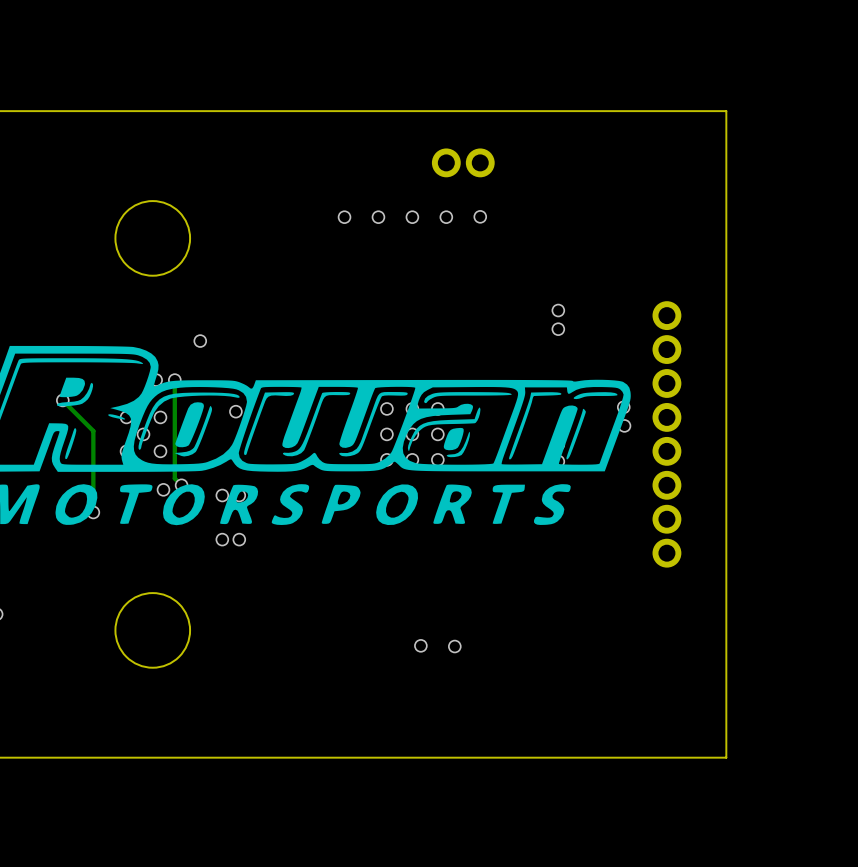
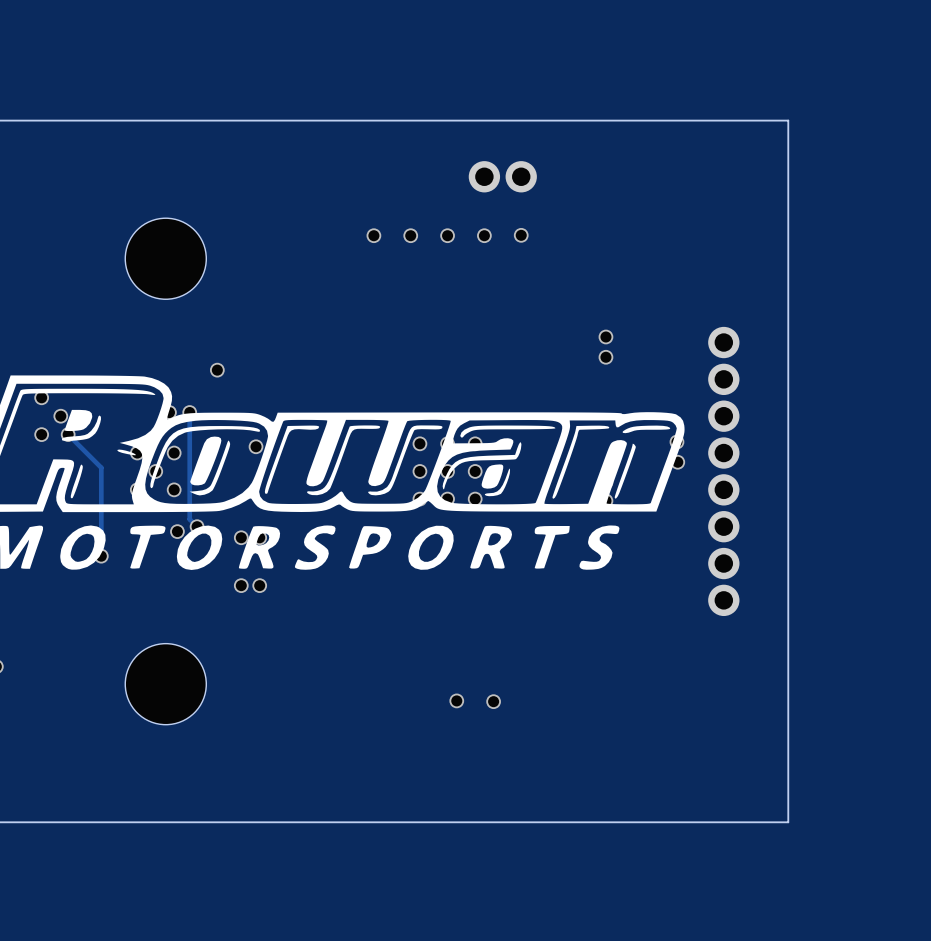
via: none -> (41, 397)
via: none -> (60, 416)
via: none -> (41, 434)

